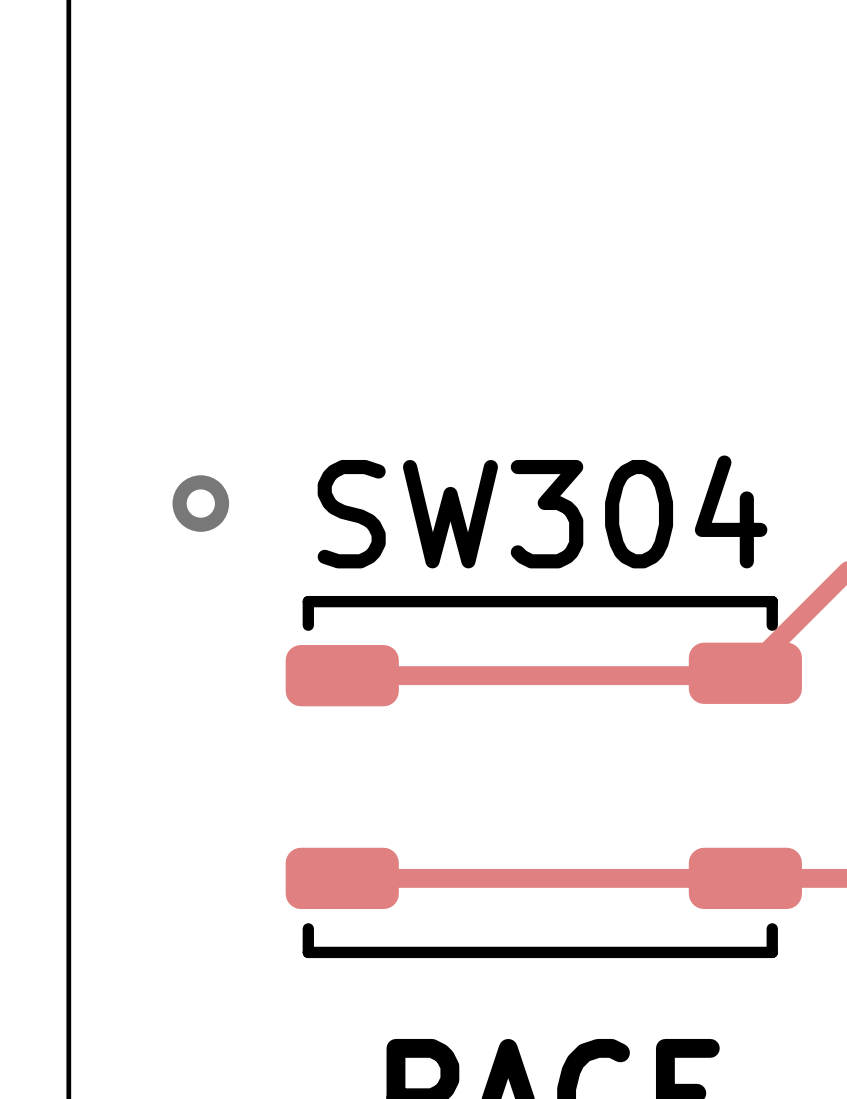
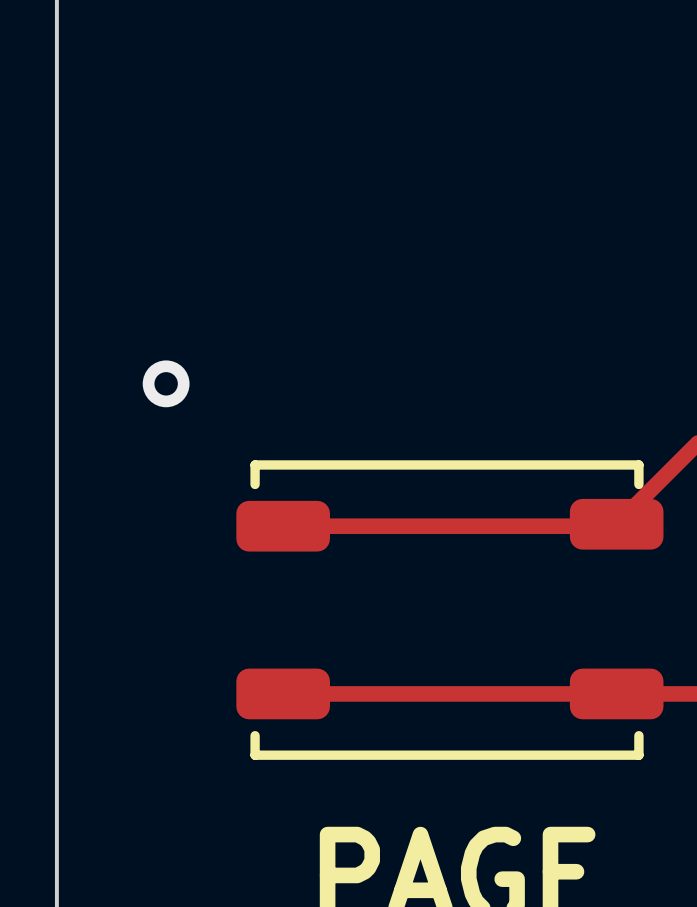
SW304 name: SW304 (542, 511) -> none

